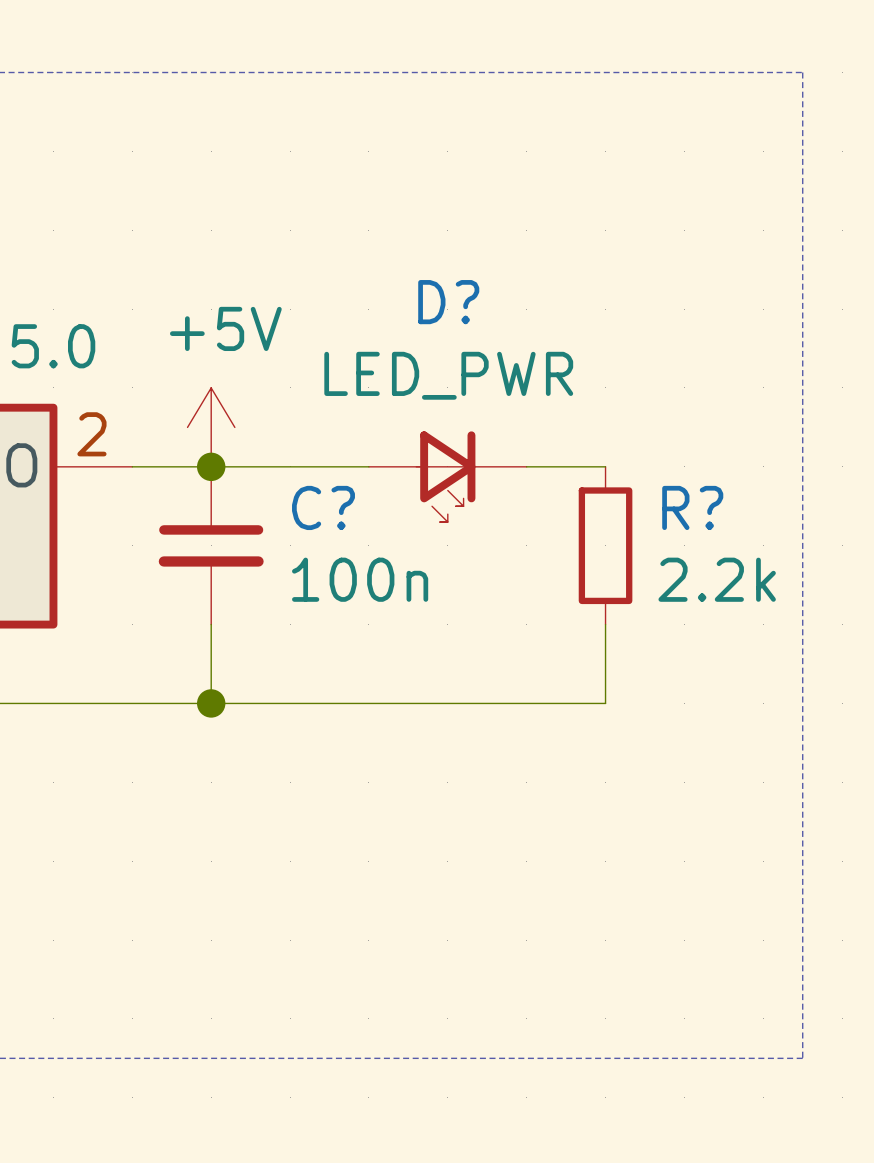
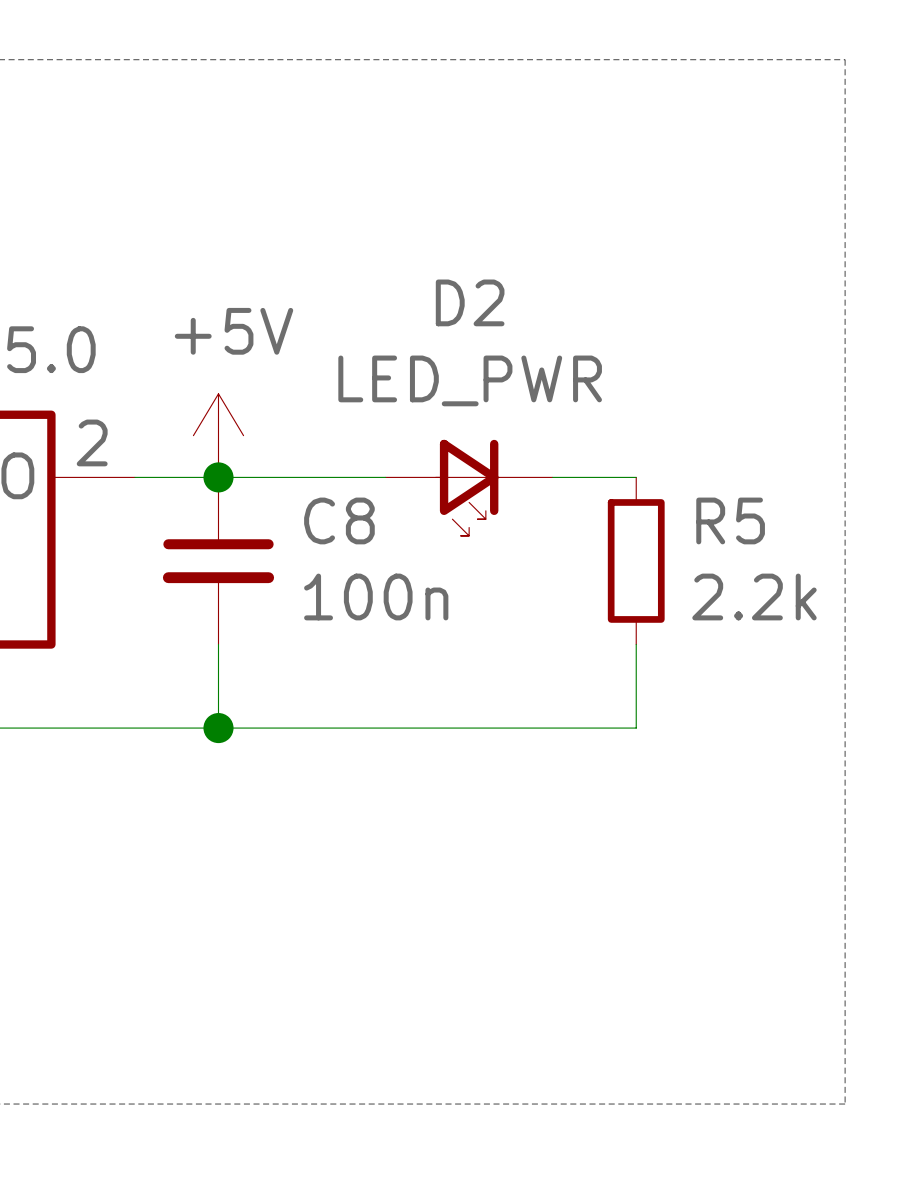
D? name: D? (448, 302) -> D2 (470, 302)
C? name: C? (323, 507) -> C8 (339, 520)
R? name: R? (692, 507) -> R5 (730, 520)

